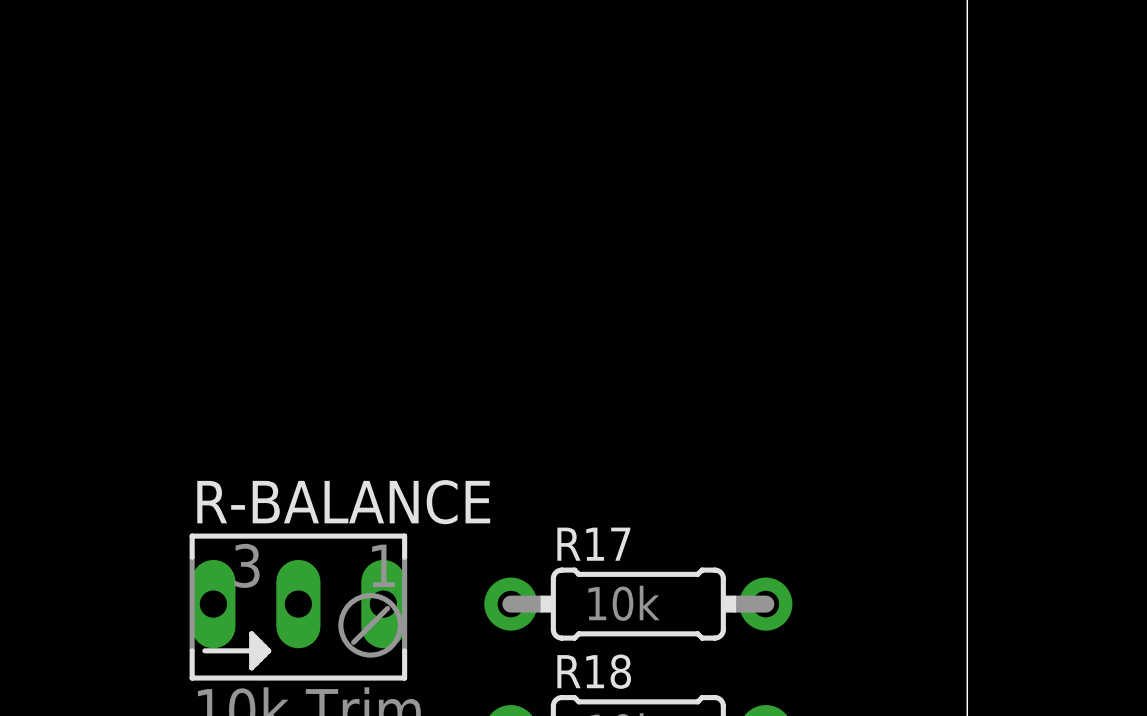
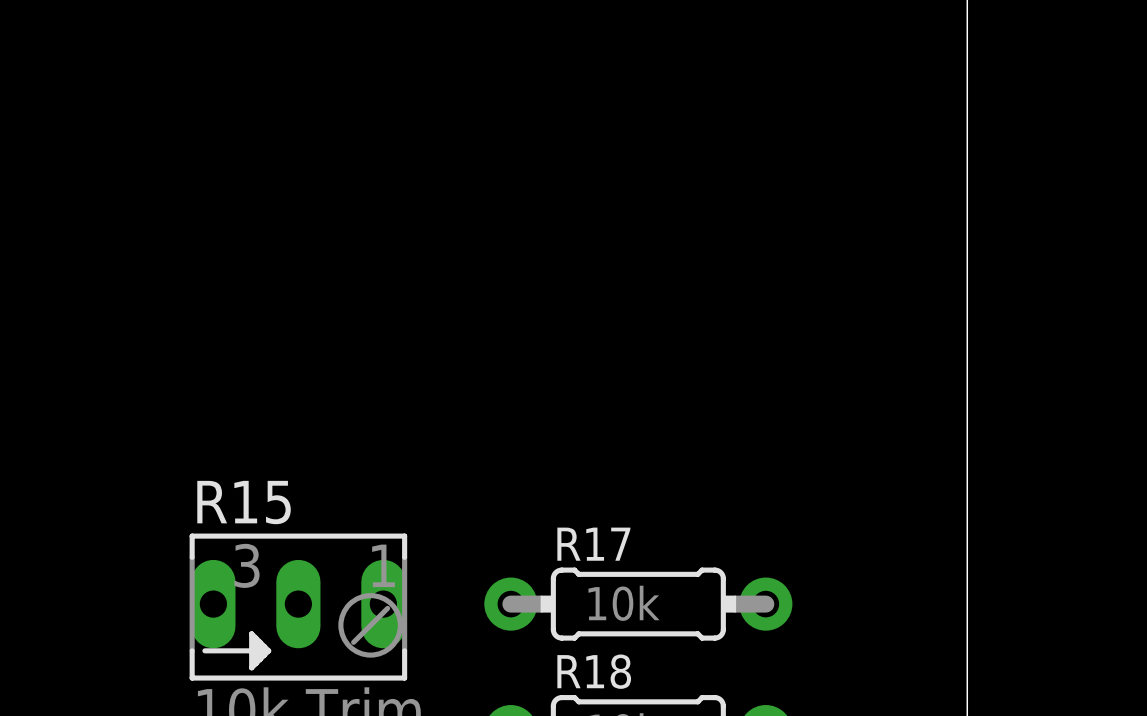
R-BALANCE name: R-BALANCE (343, 502) -> R15 (244, 502)

